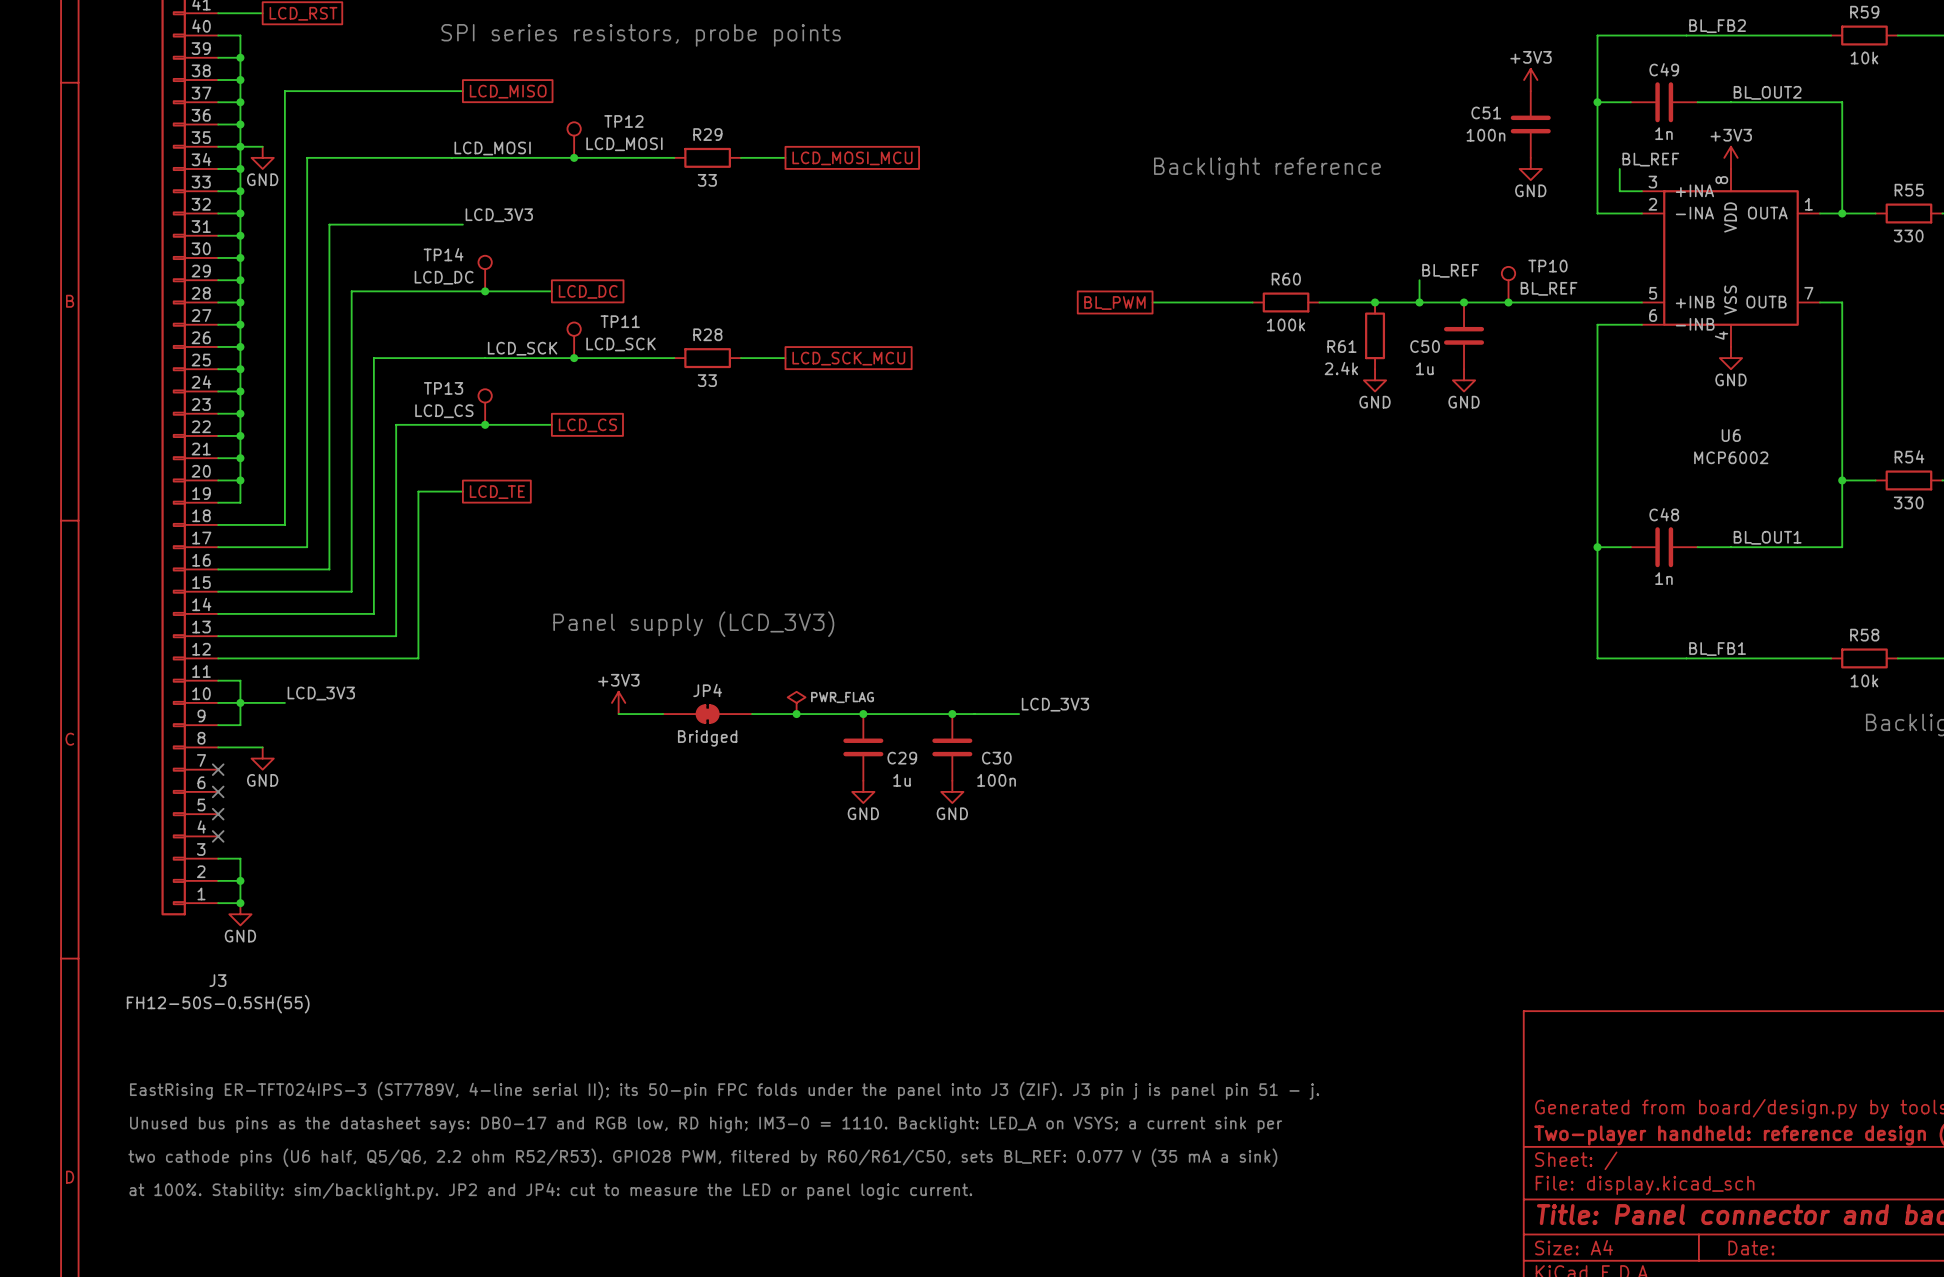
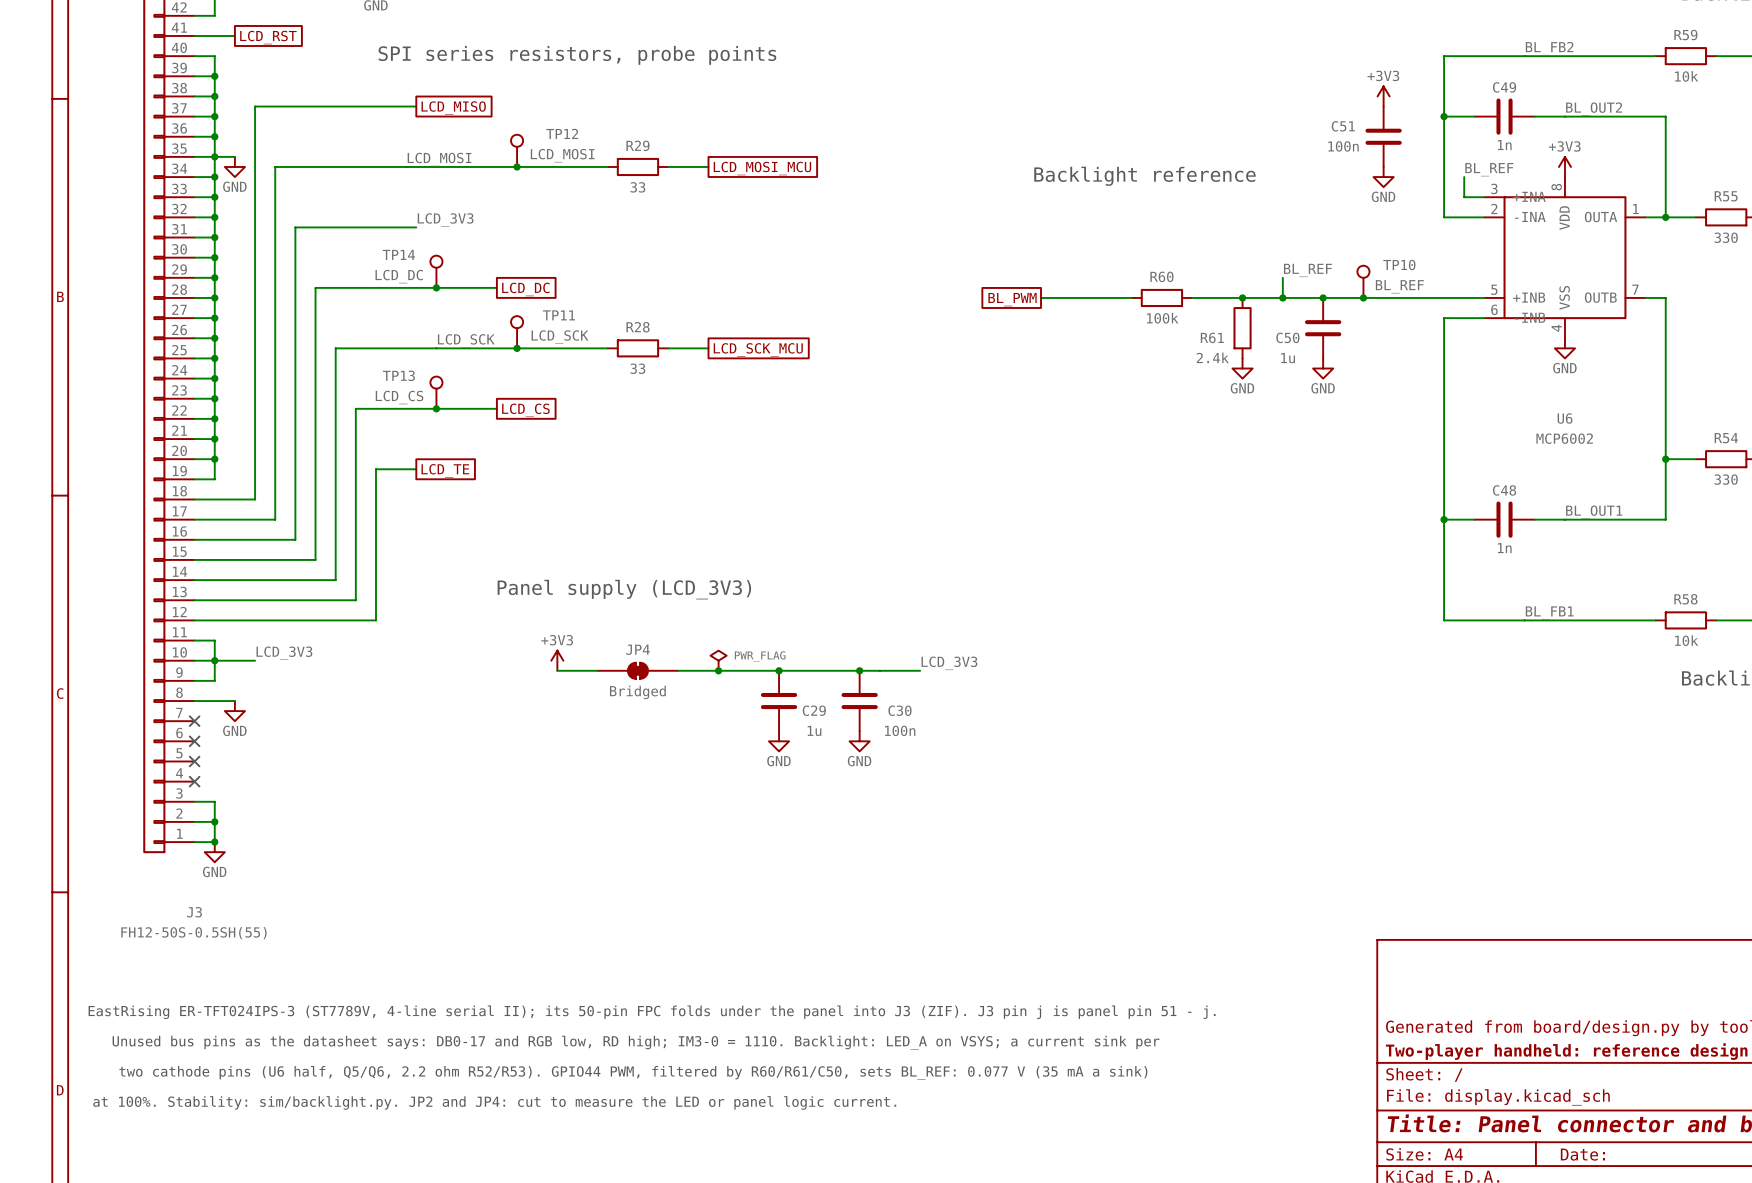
text: two cathode pins (U6 half, Q5/Q6, 2.2 ohm R52/R53). GPIO28 PWM, filtered by R60/R61/C50, sets BL_REF: 0.077 V (35 mA a sink) (702, 1157) -> two cathode pins (U6 half, Q5/Q6, 2.2 ohm R52/R53). GPIO44 PWM, filtered by R60/R61/C50, sets BL_REF: 0.077 V (35 mA a sink) (633, 1072)

